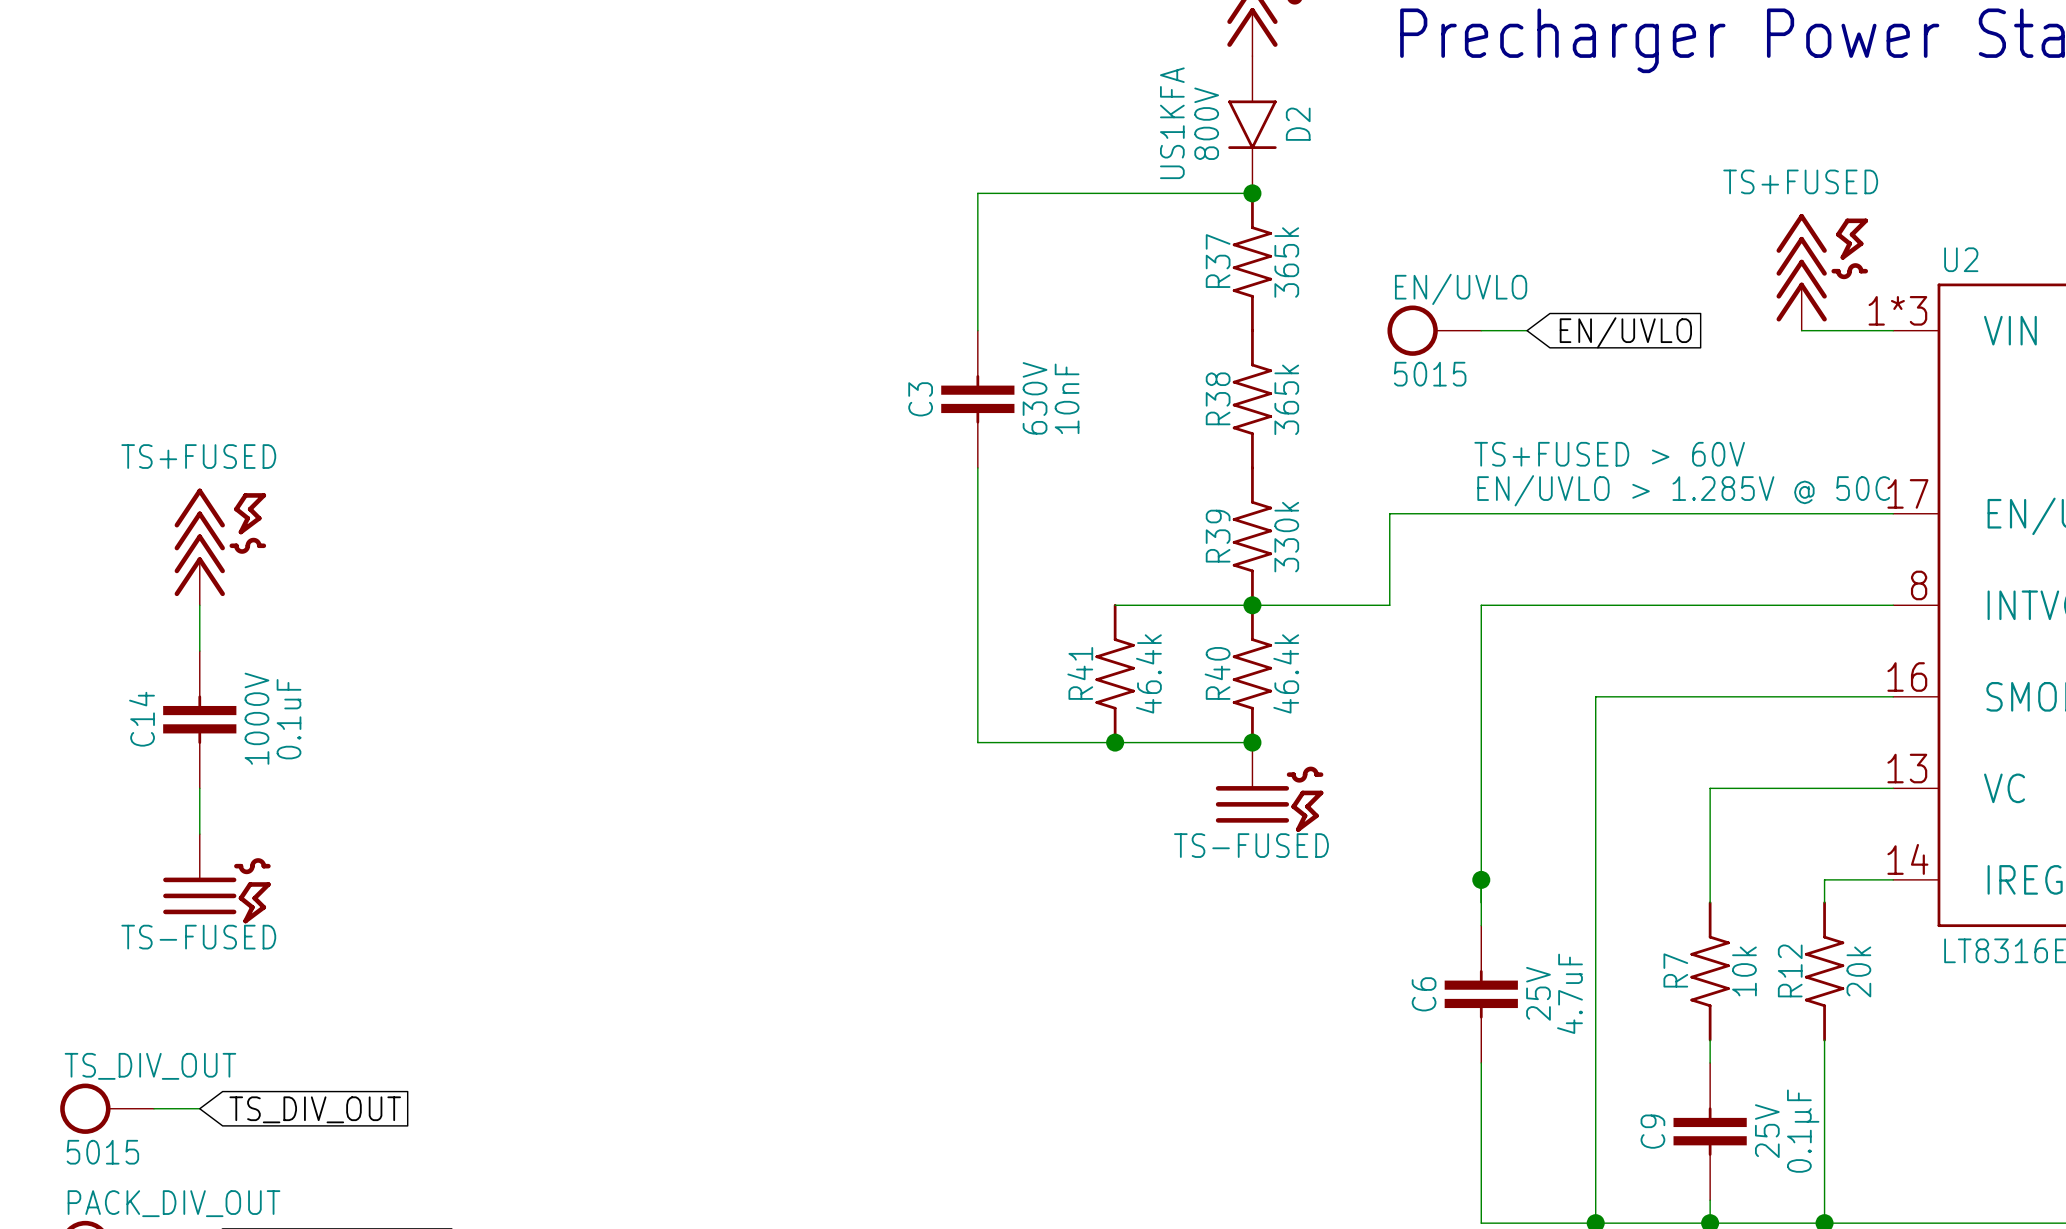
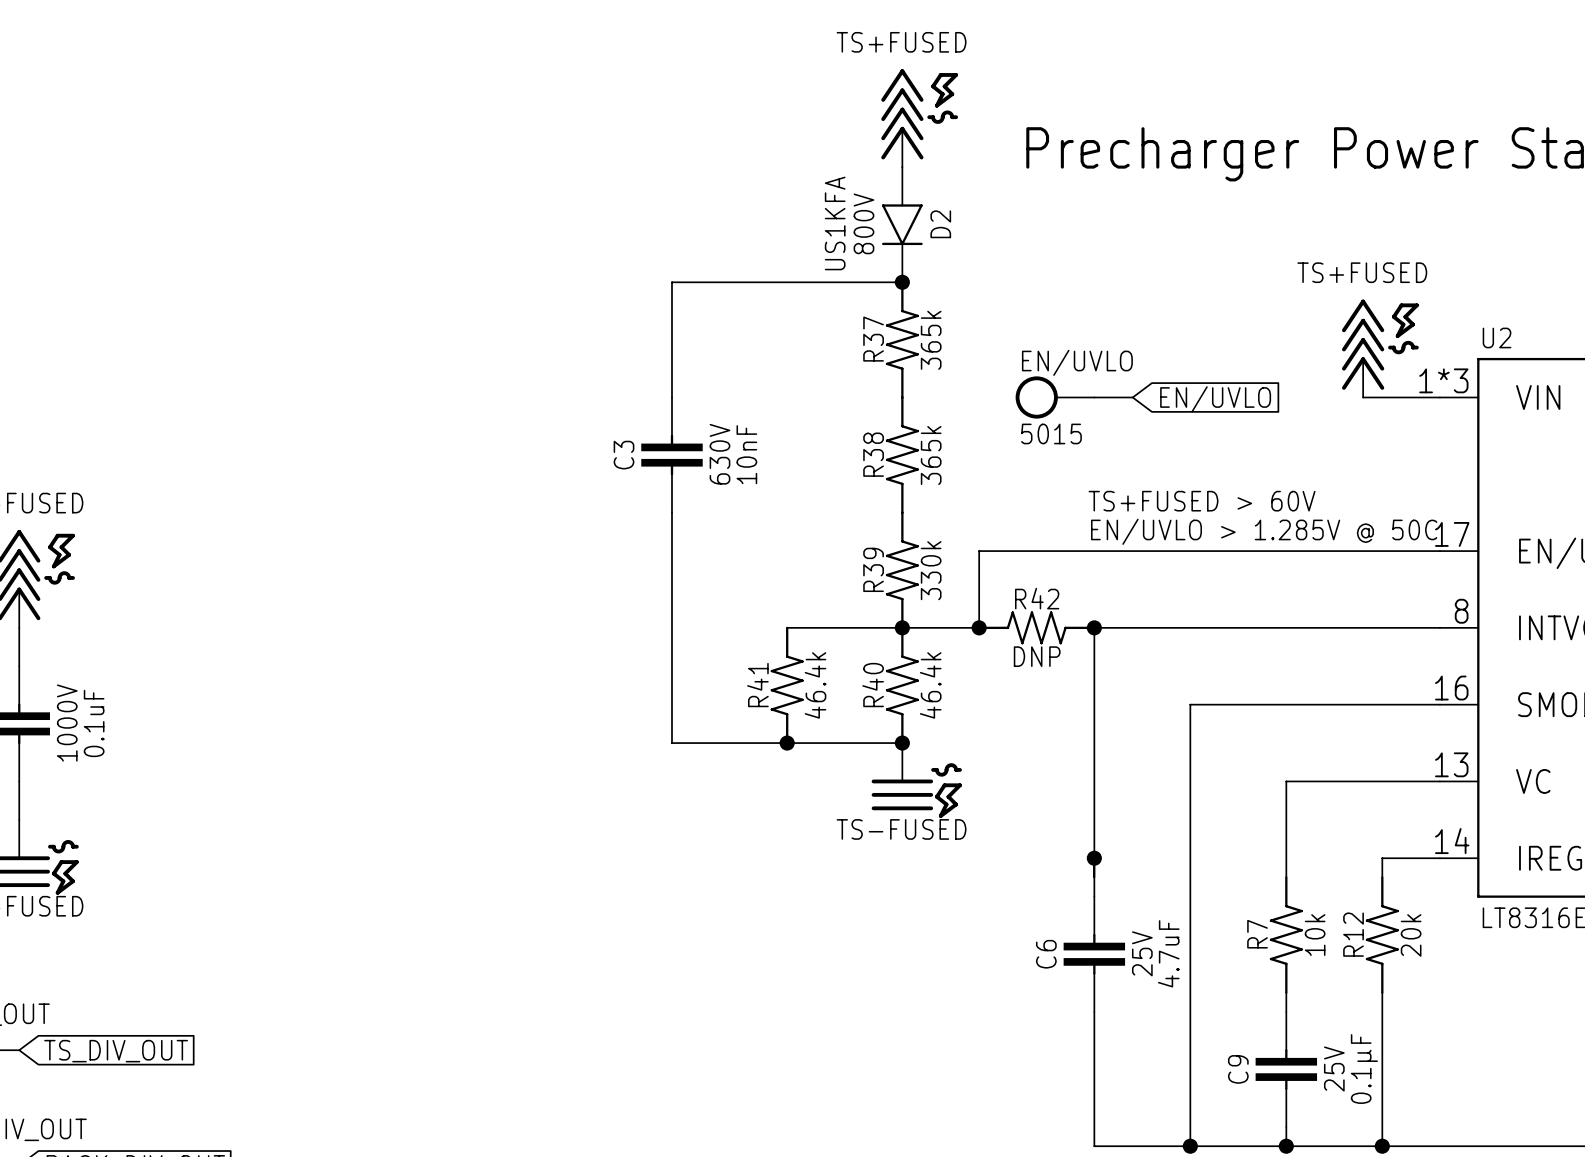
wire: (1389, 513) (1389, 605) (1343, 605) -> (1017, 551) (979, 551) (979, 627)
junction: none -> (979, 627)
R42: none -> (1036, 627)
junction: none -> (1094, 627)

